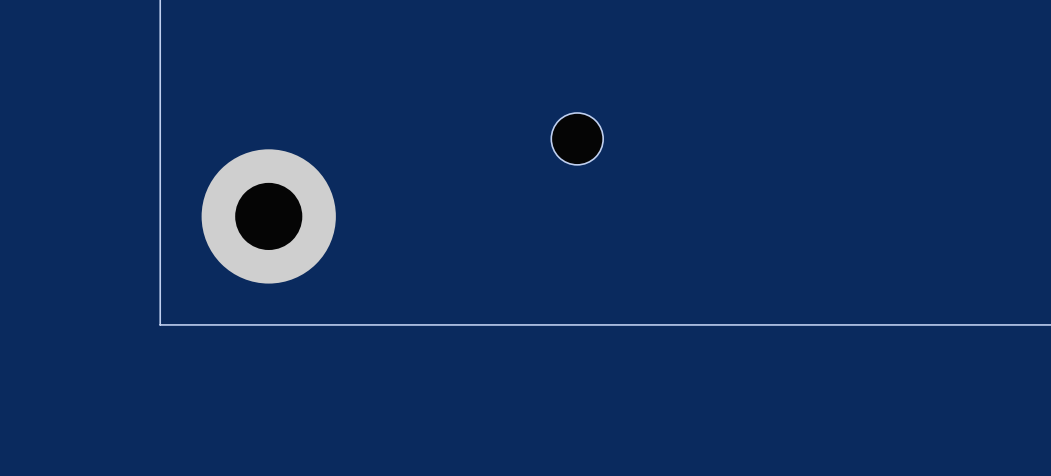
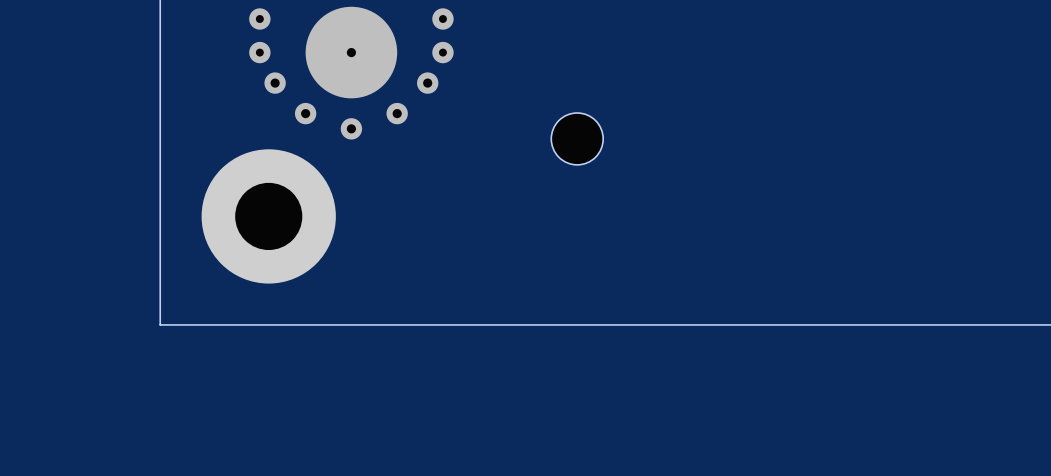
via: none -> (259, 19)
via: none -> (442, 19)
via: none -> (259, 52)
via: none -> (351, 52)
via: none -> (442, 52)
via: none -> (275, 83)
via: none -> (427, 83)
via: none -> (305, 113)
via: none -> (397, 113)
via: none -> (351, 128)

